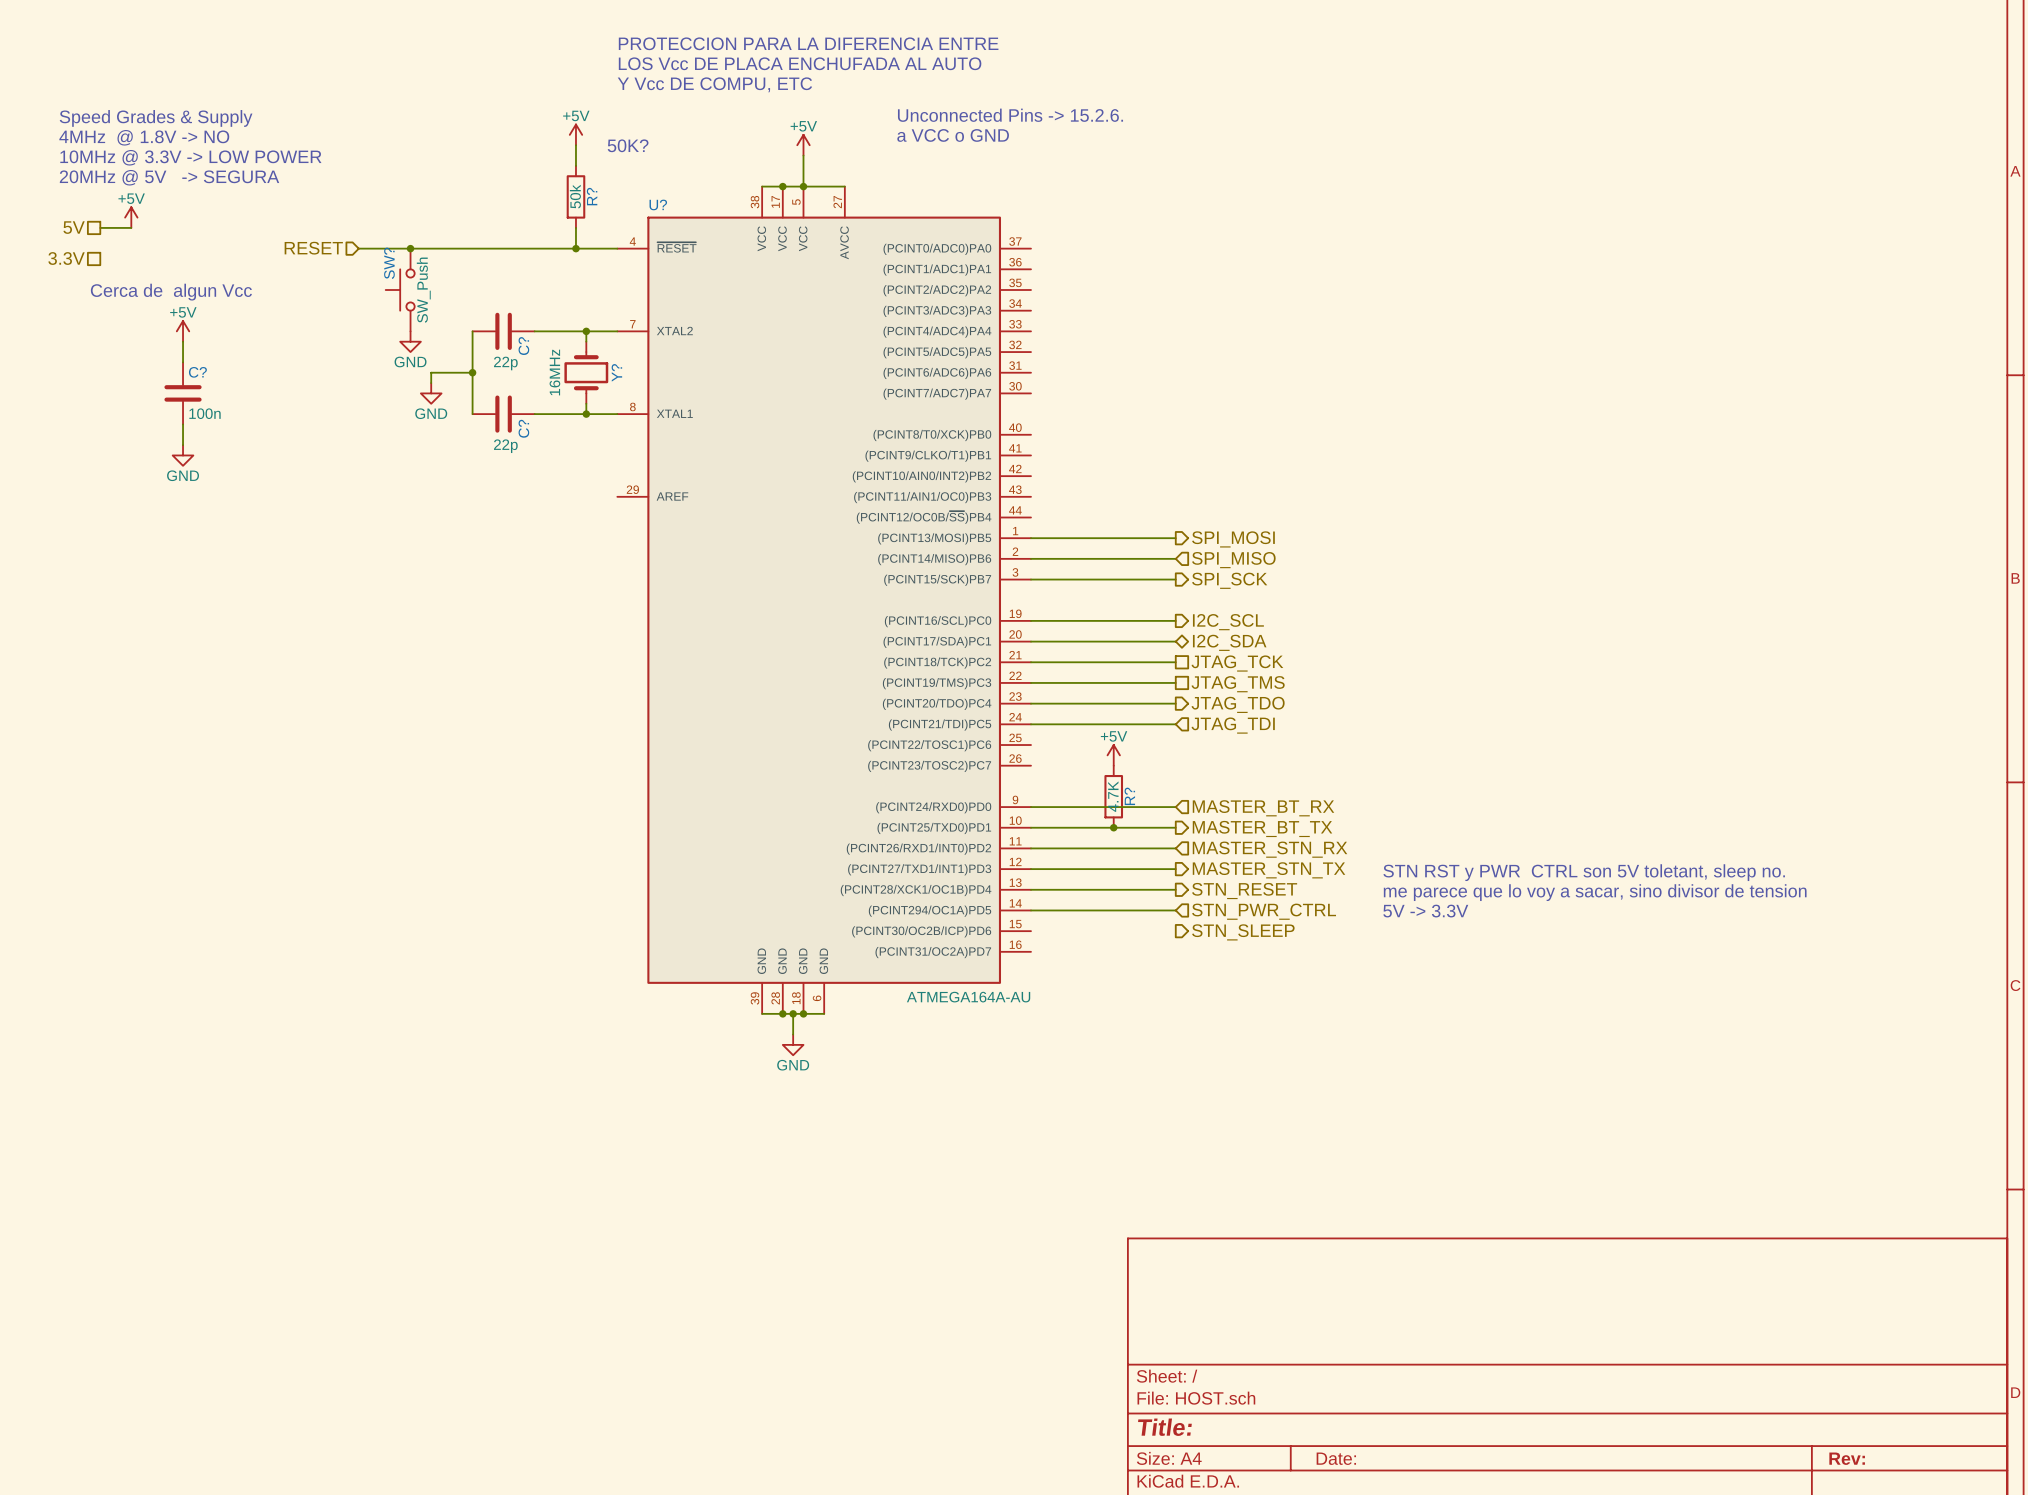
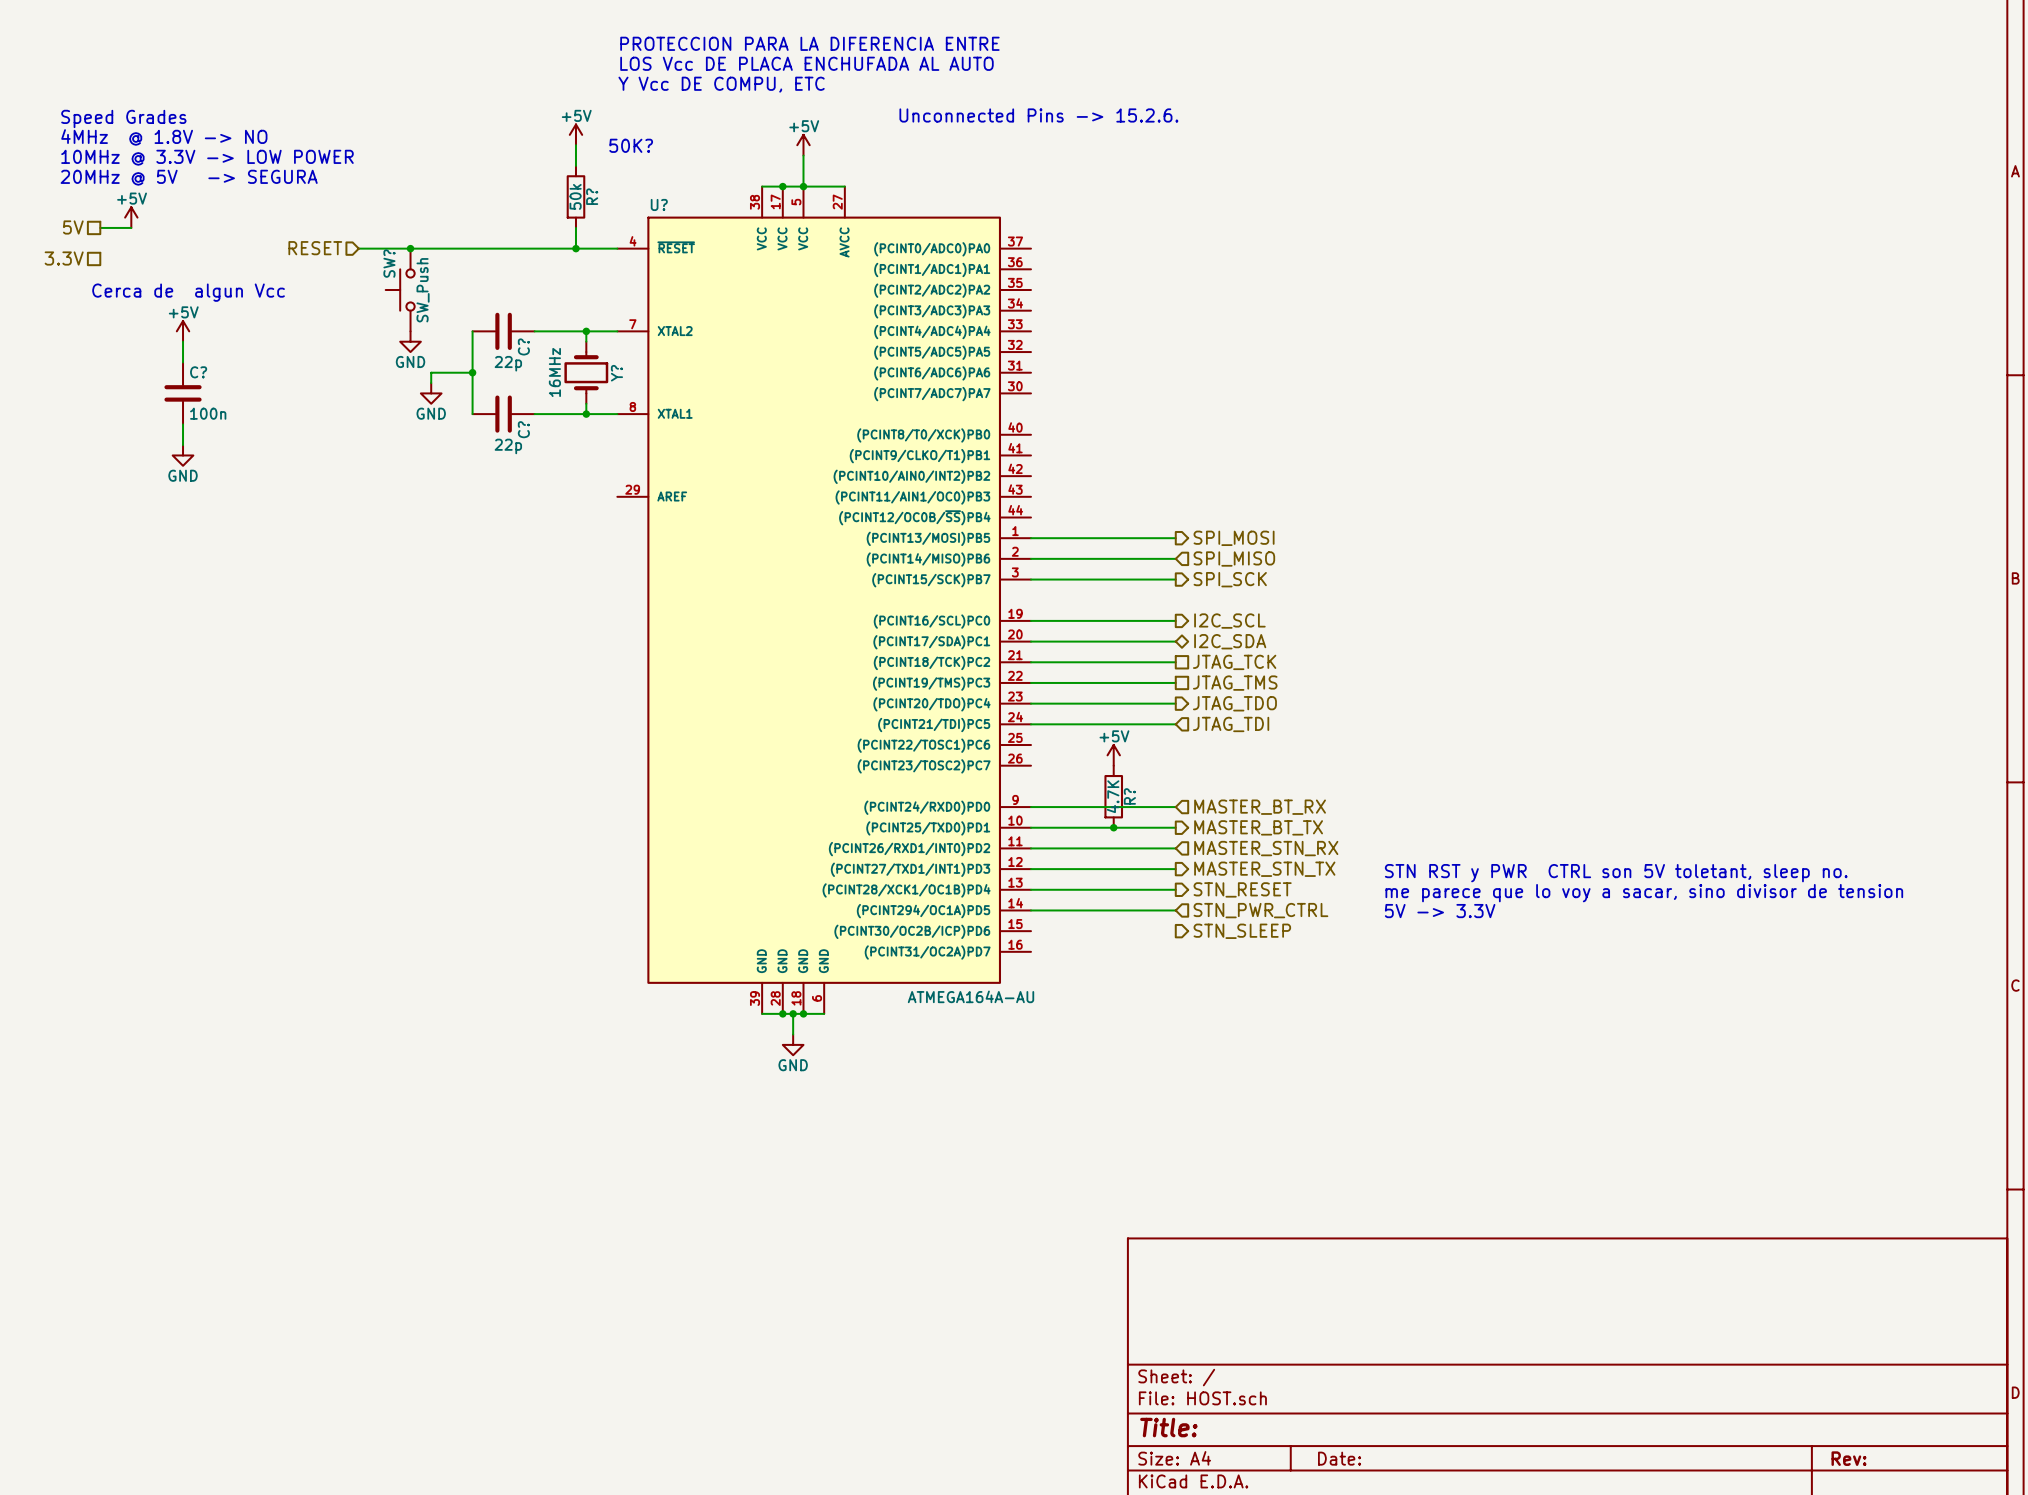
text: Speed Grades & Supply (156, 118) -> Speed Grades (123, 118)
text: a VCC o GND (953, 135) -> none

